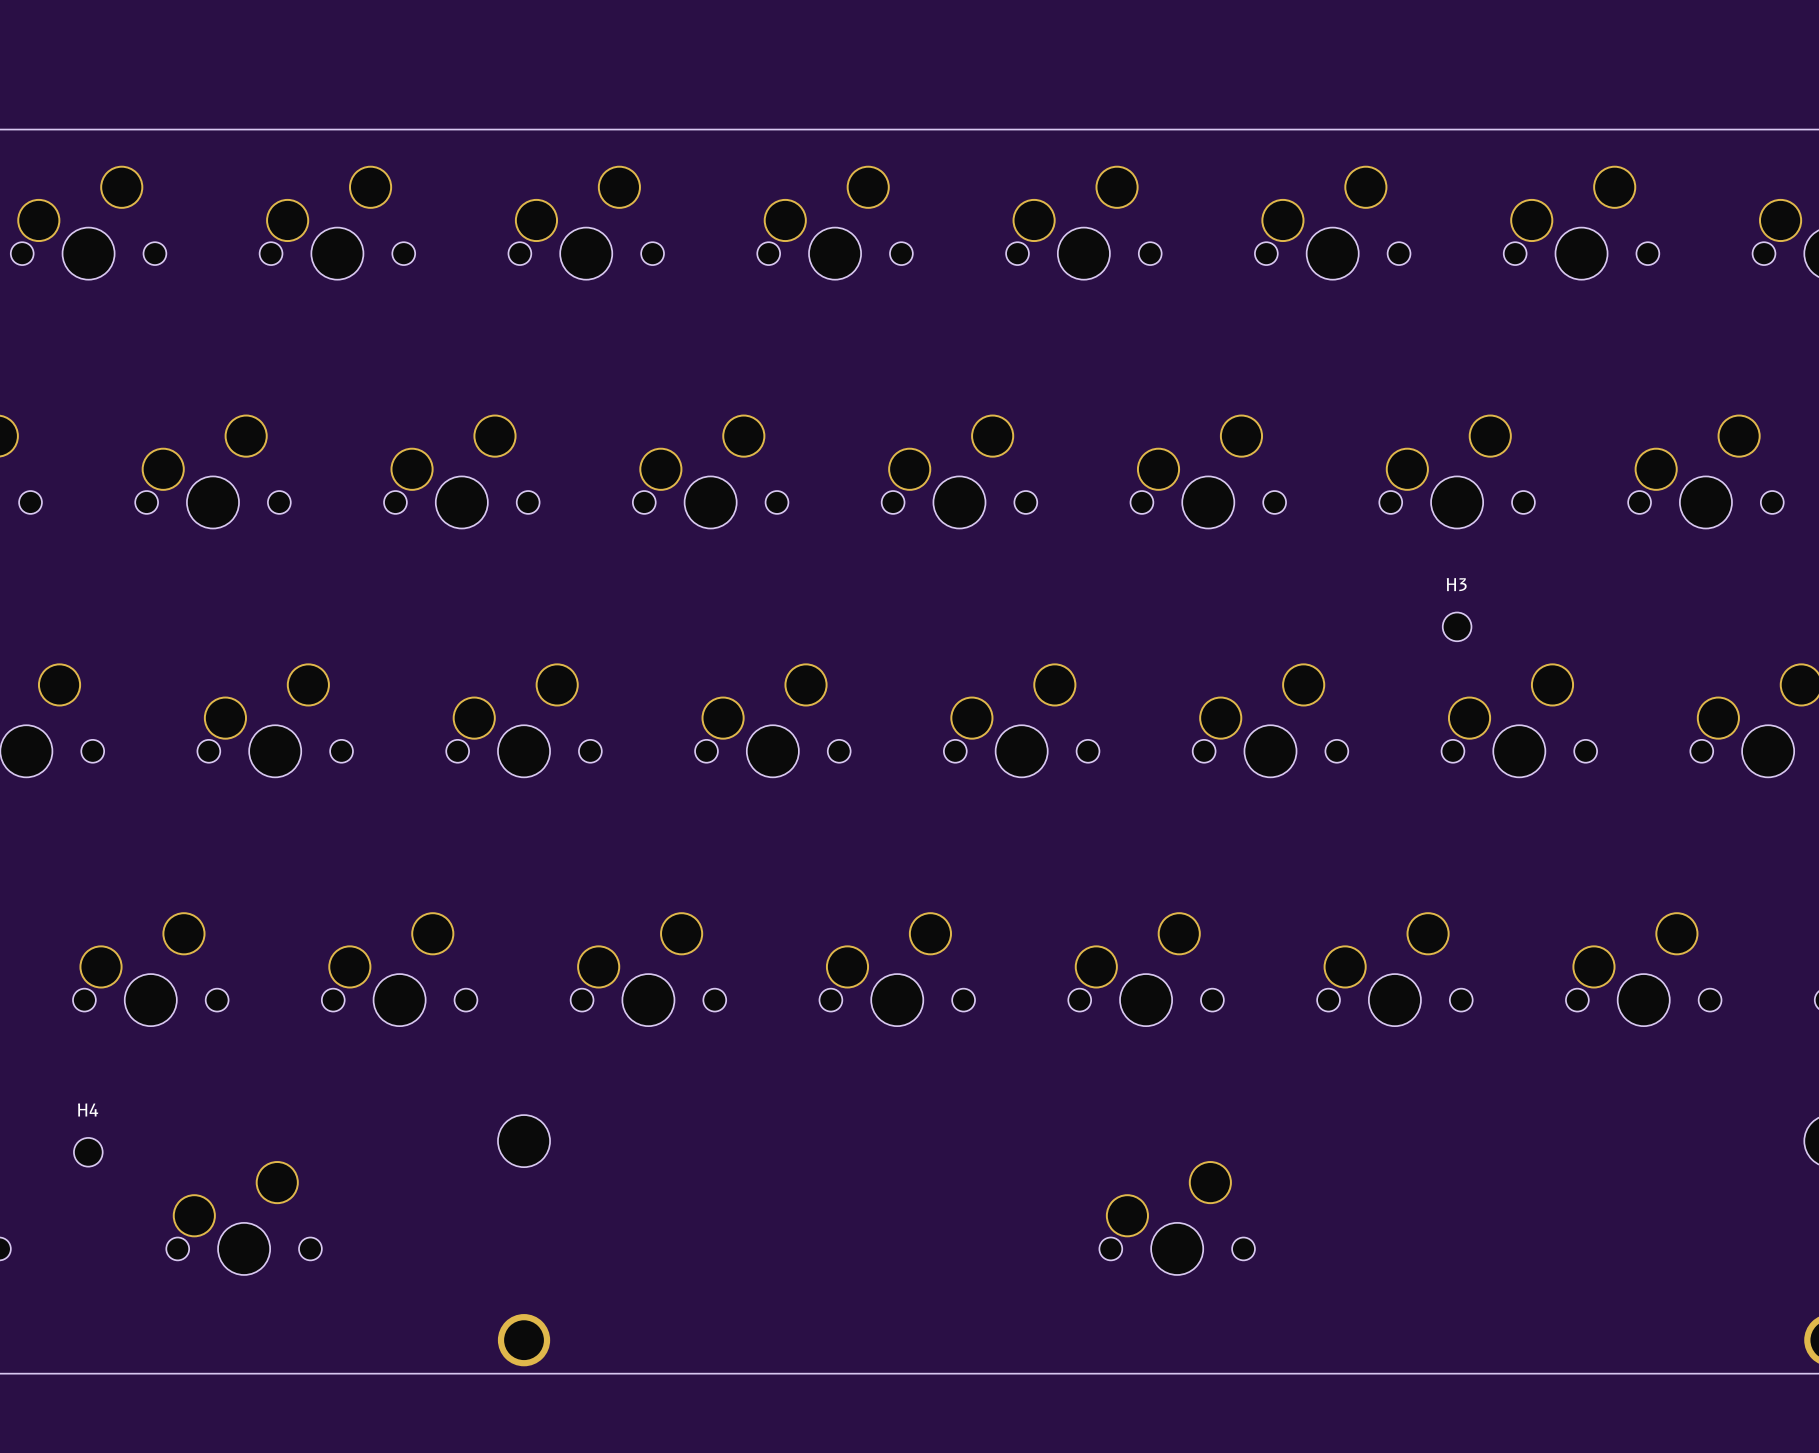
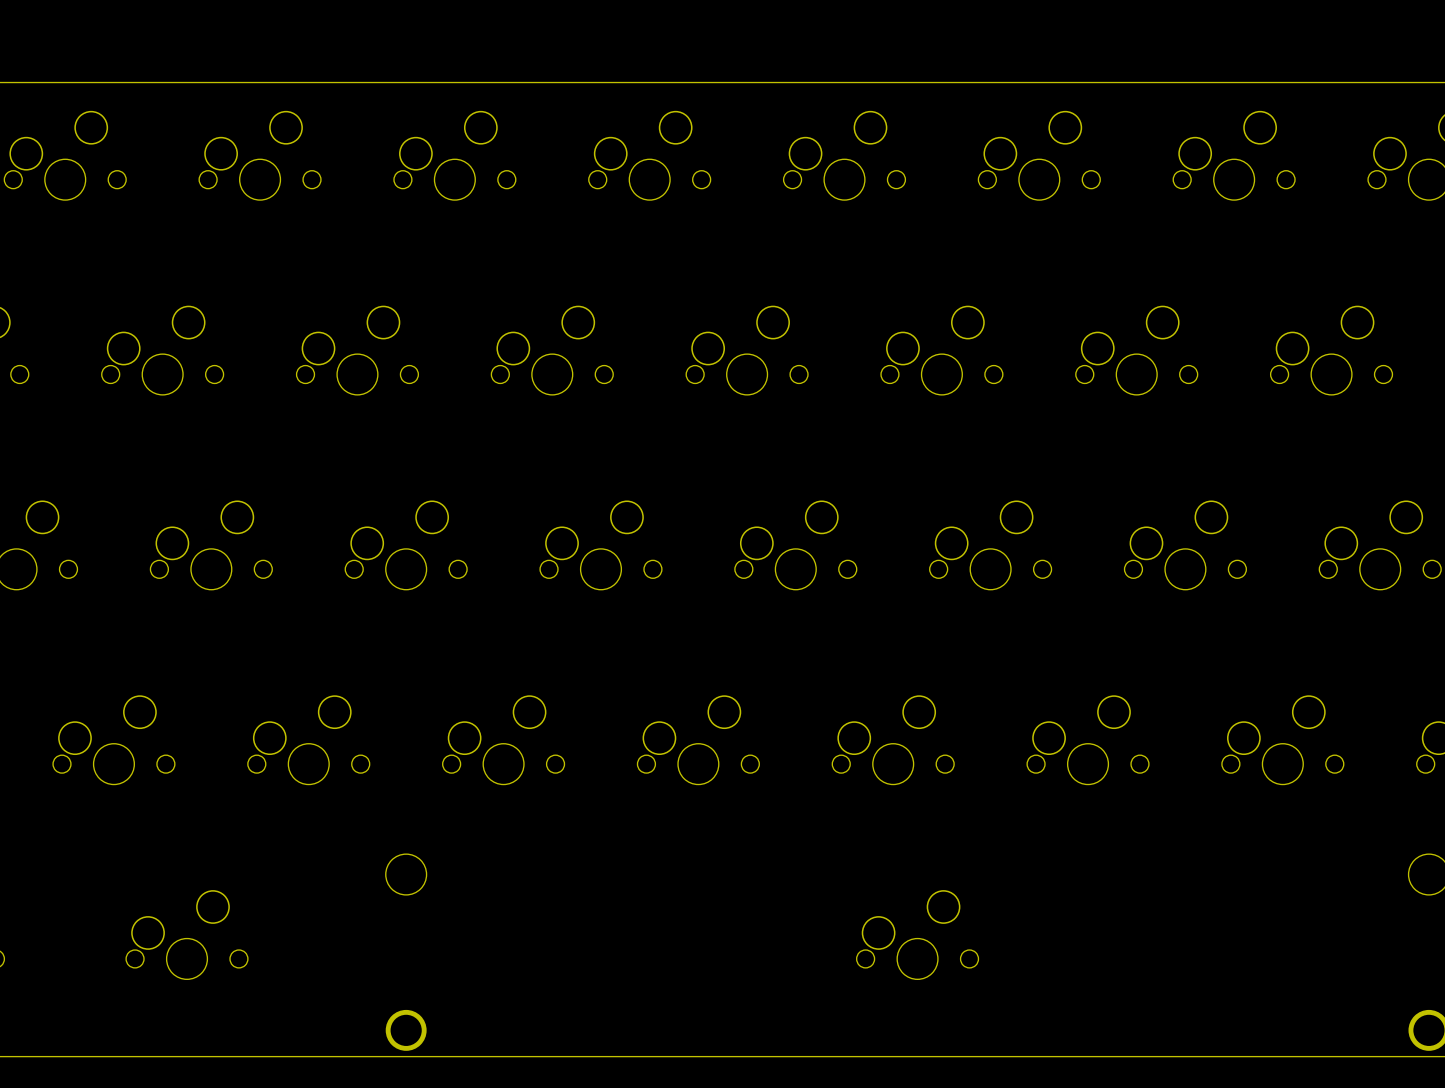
H3: (1457, 626) -> none
H4: (88, 1152) -> none

